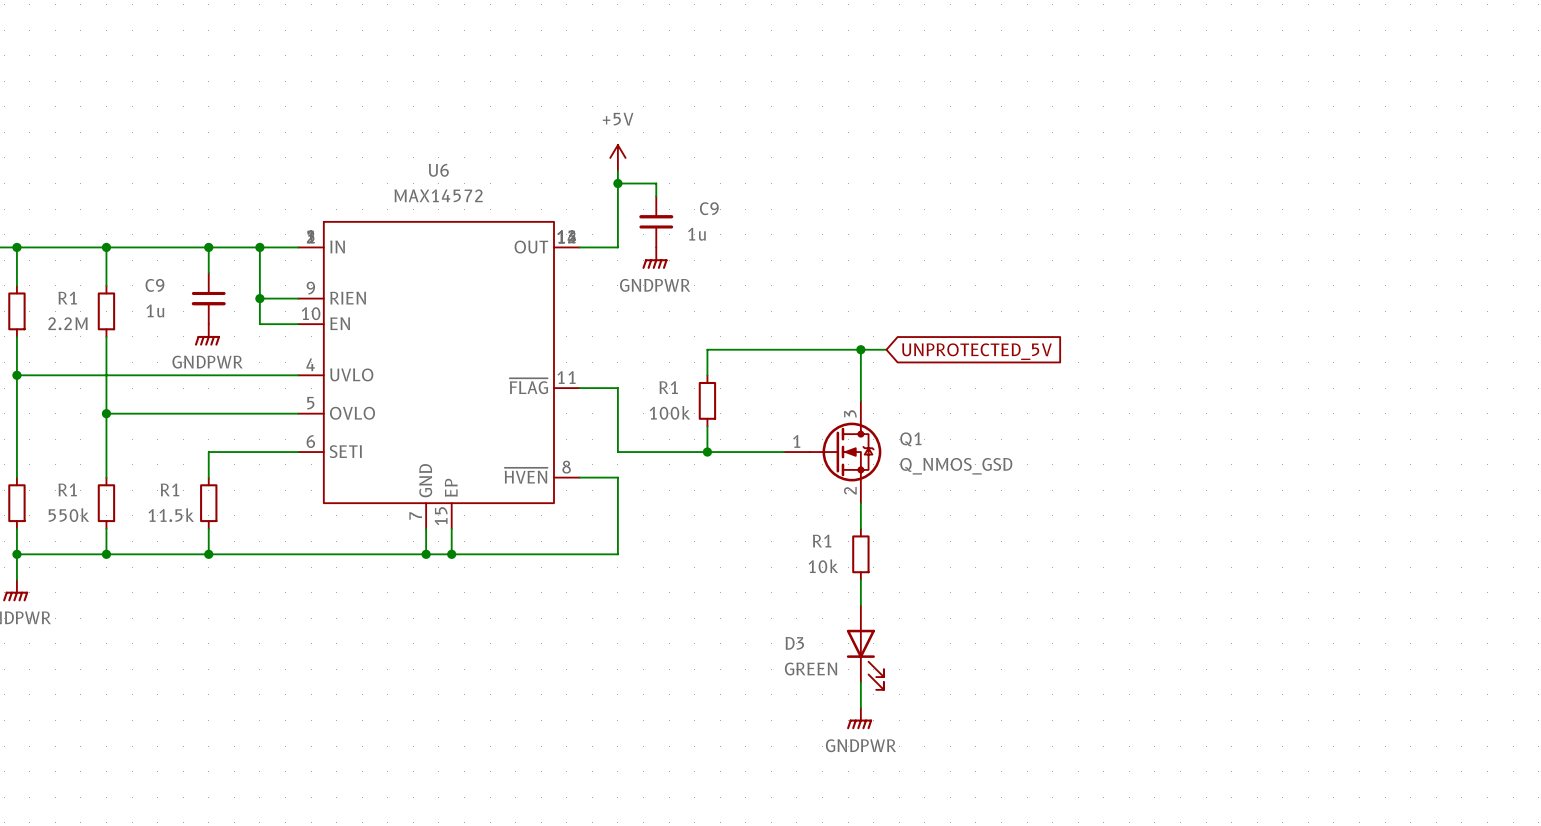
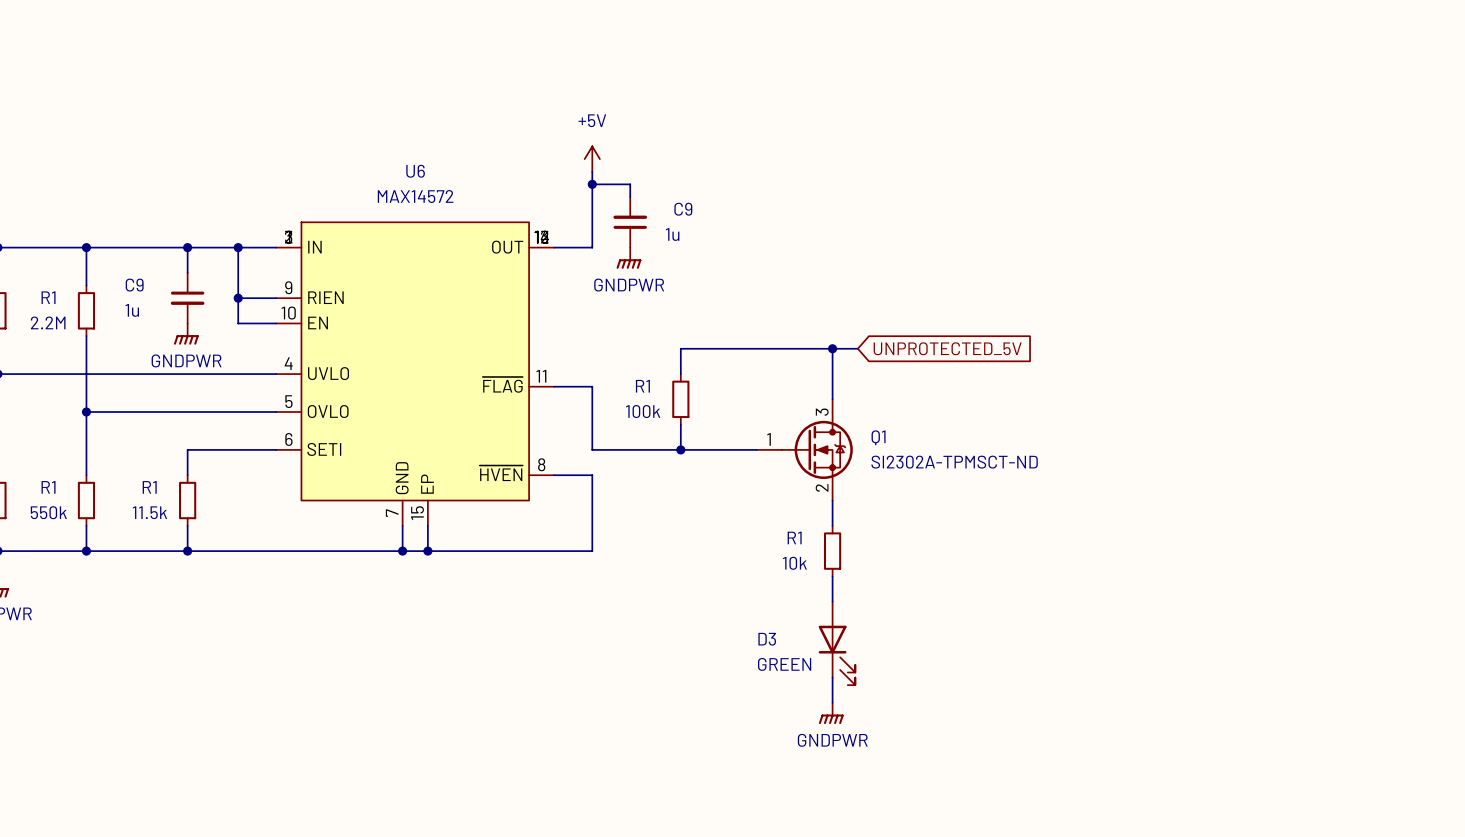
Q1 value: Q_NMOS_GSD (956, 466) -> SI2302A-TPMSCT-ND (954, 462)

